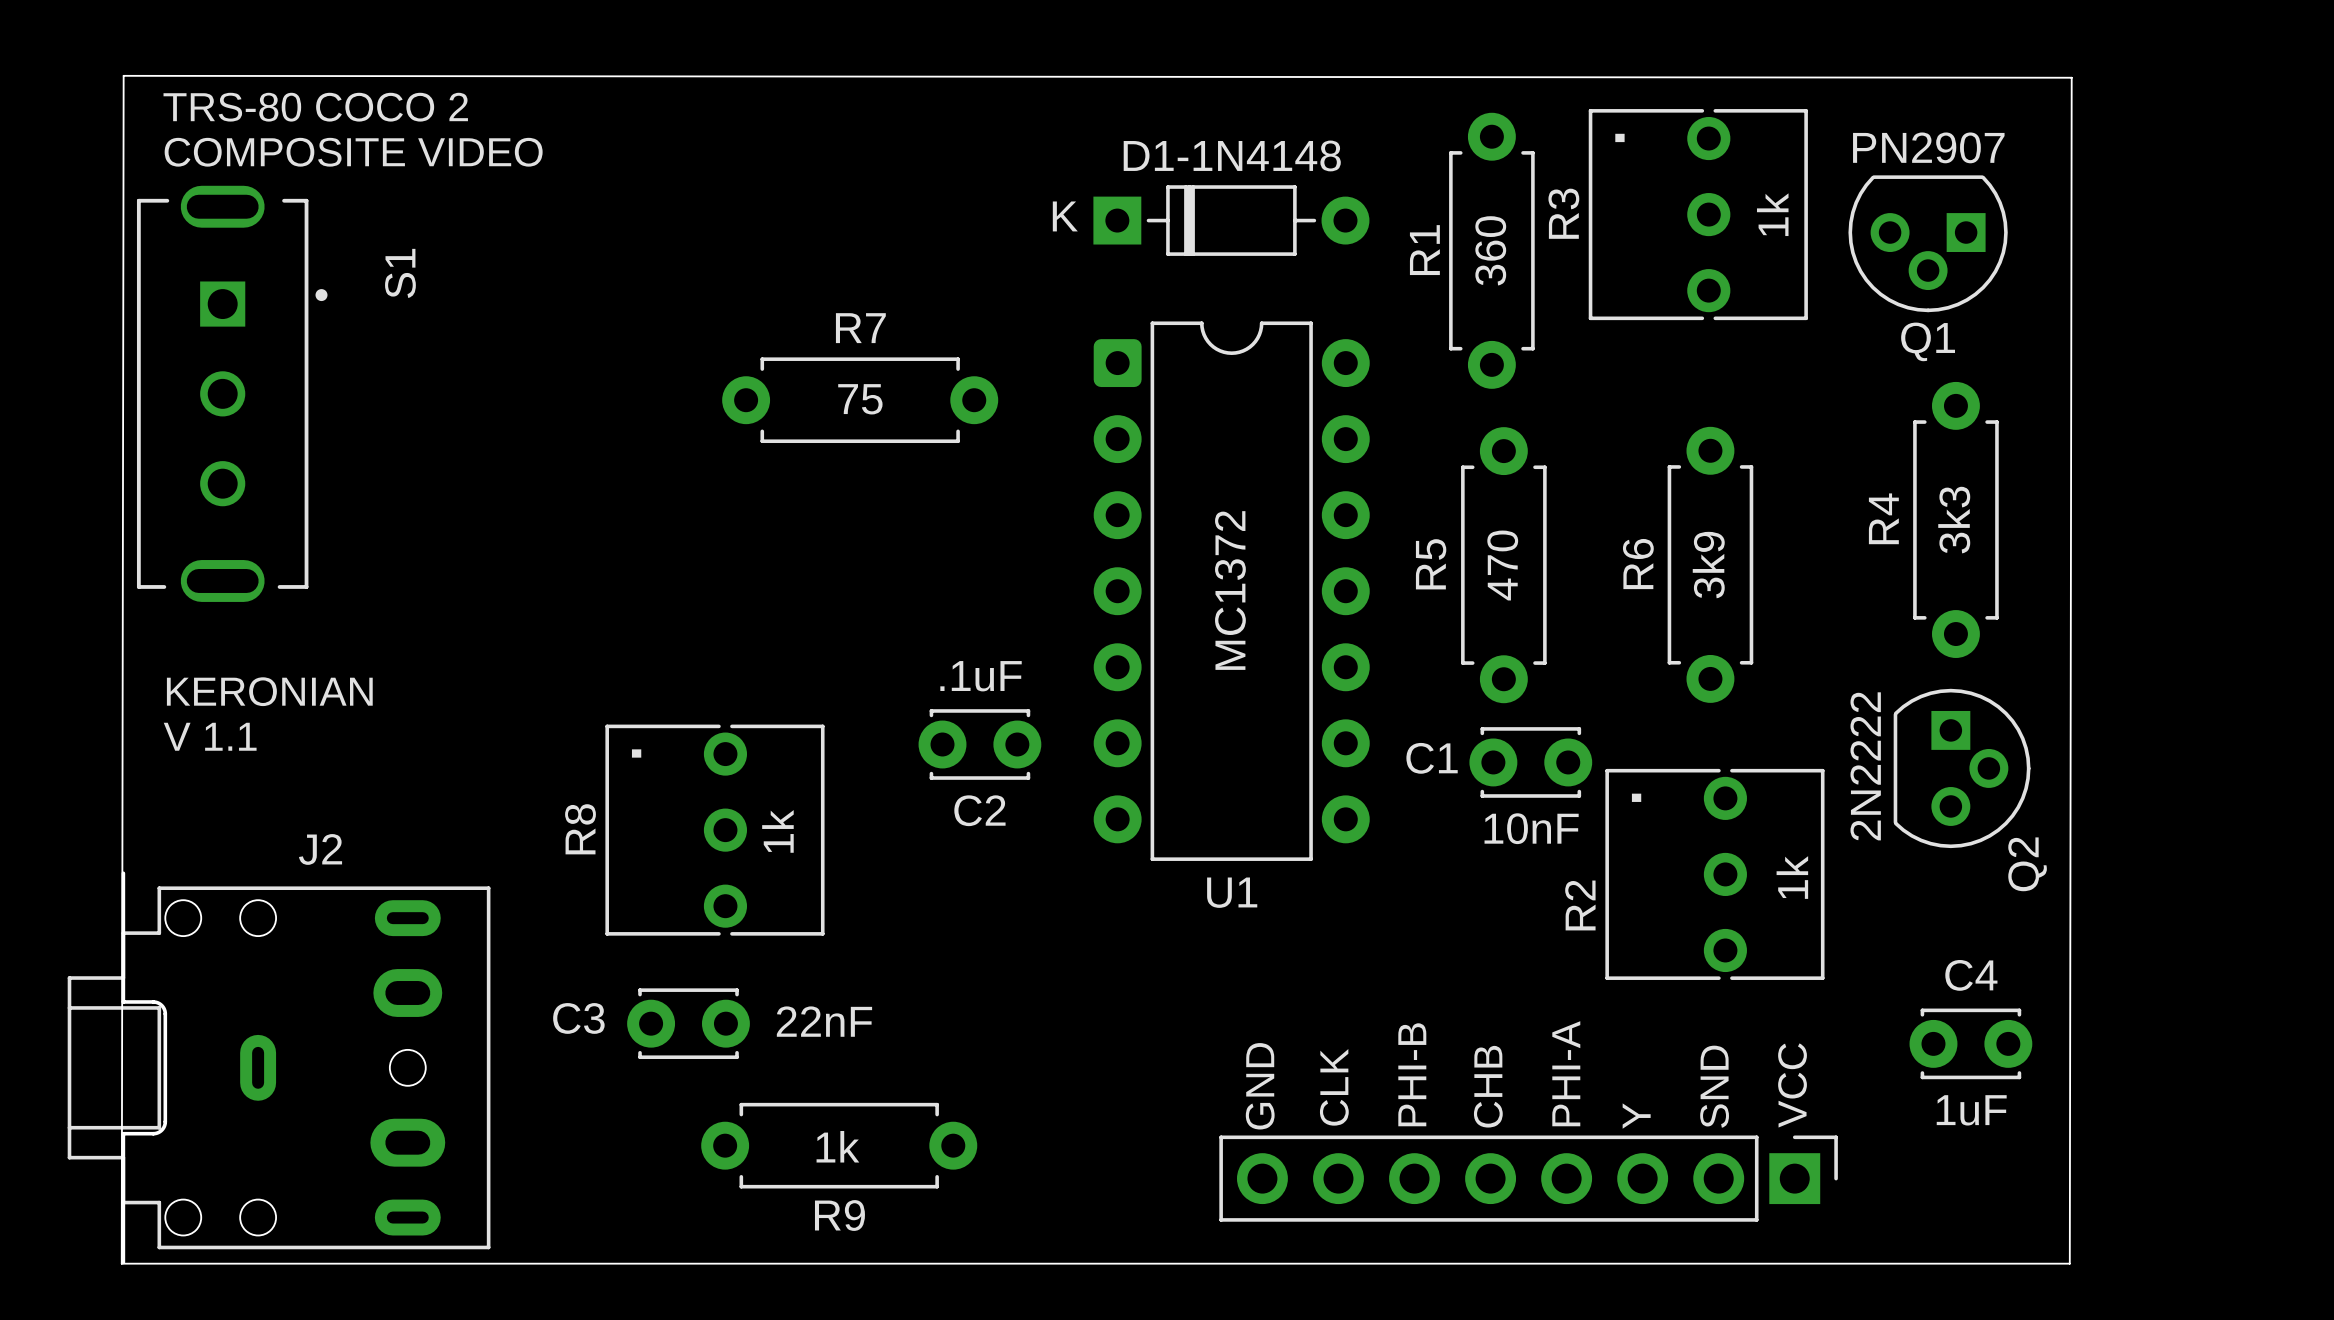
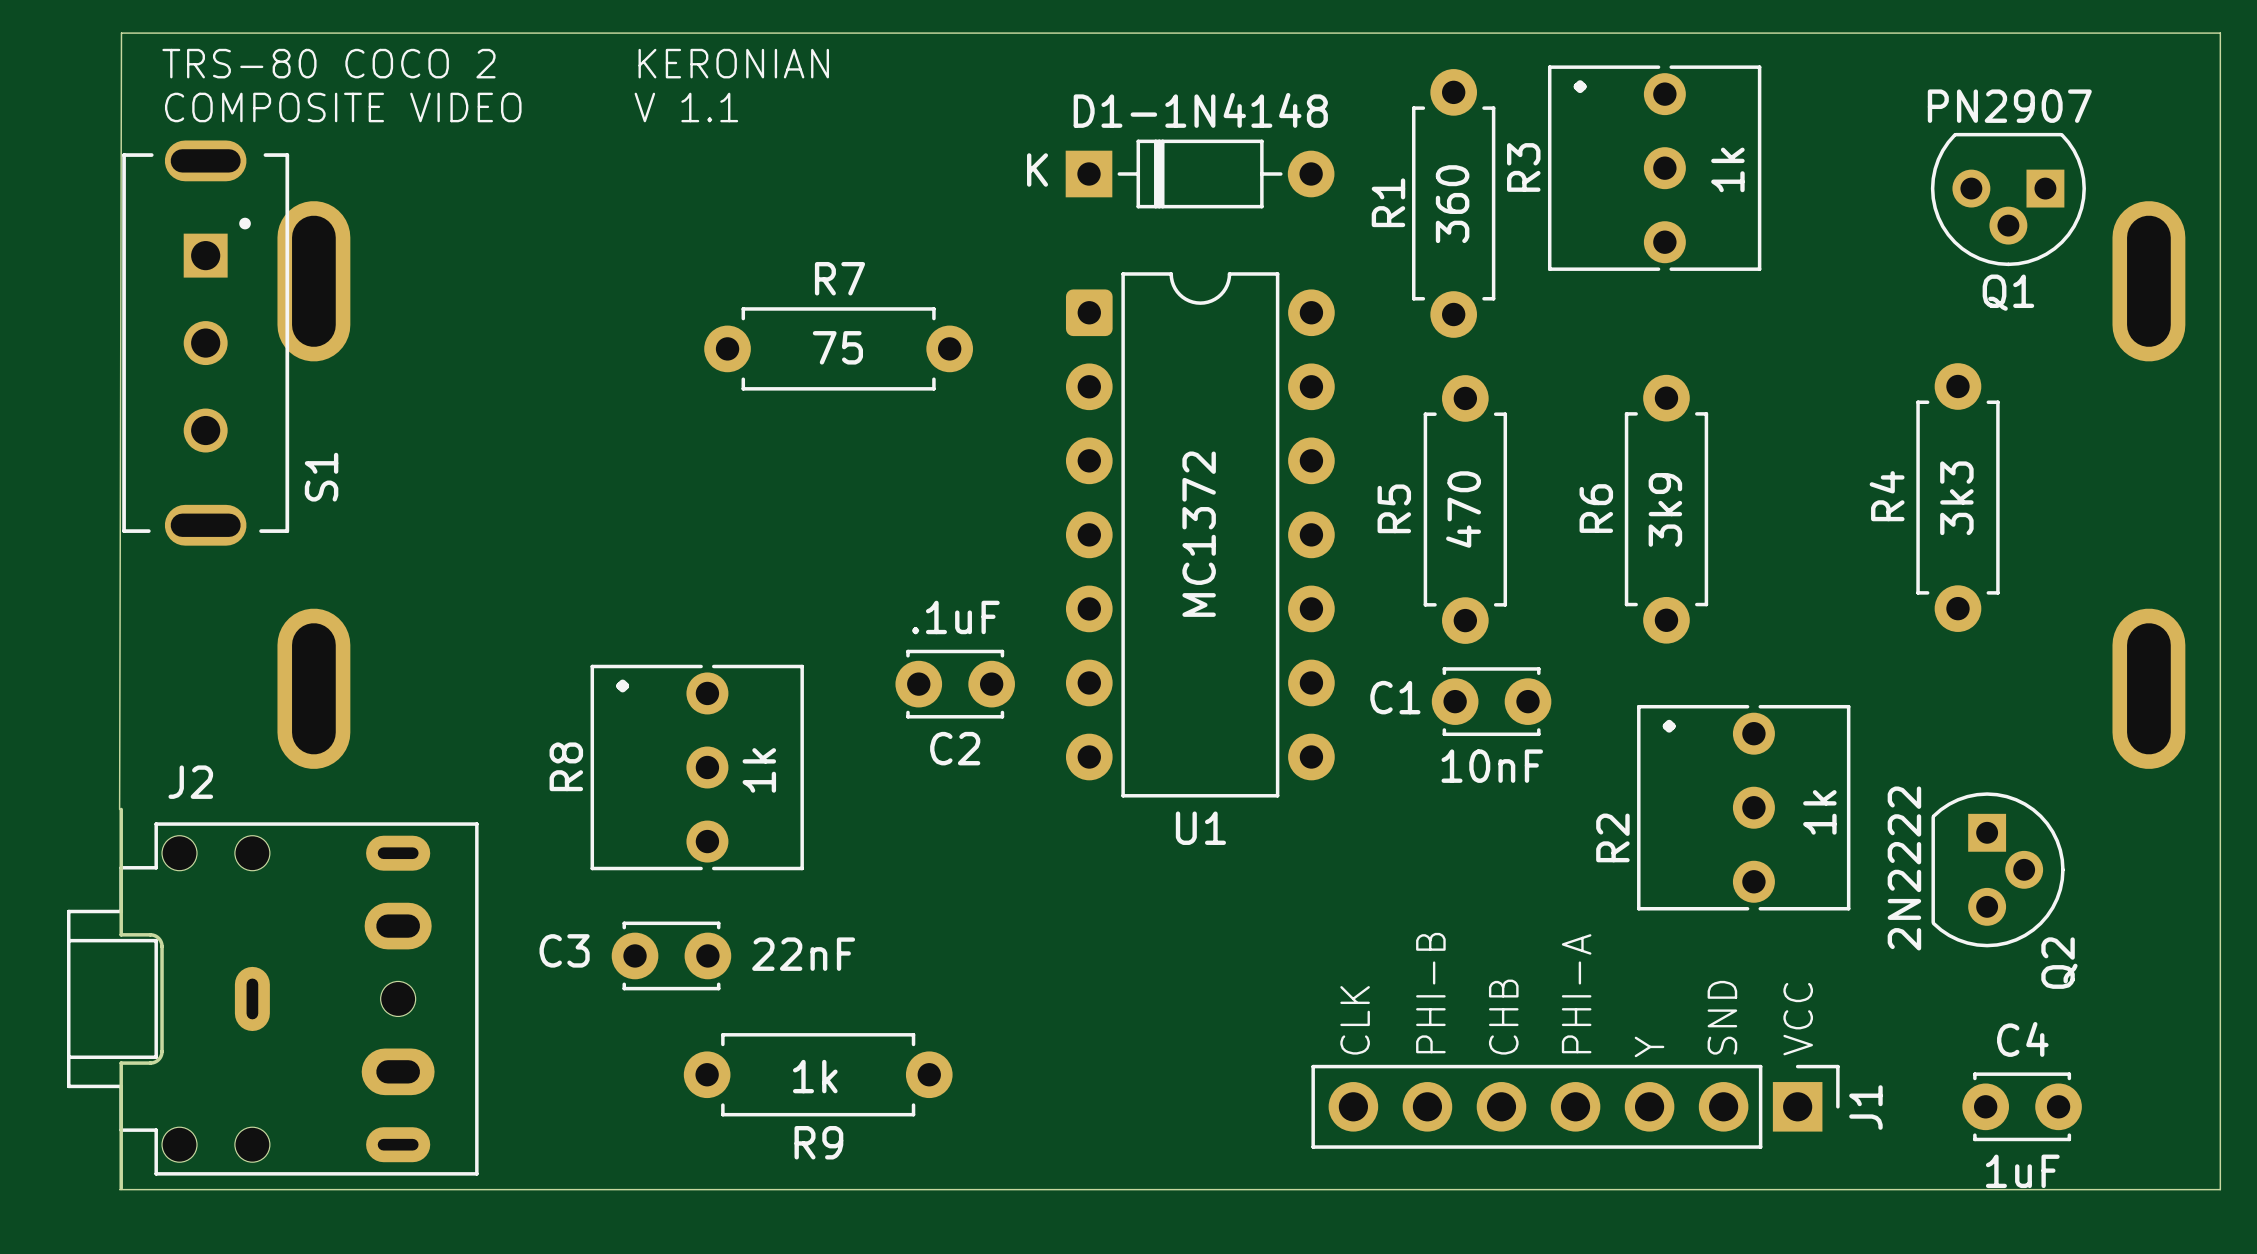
text: none -> KERONIAN (733, 63)
text: none -> V 1.1 (686, 107)
S1 footprint: [136, 185, 328, 602] -> [122, 140, 290, 546]
Q1 position: (1928, 243) -> (2008, 199)
S1 name position: S1 (400, 273) -> S1 (321, 477)
part: none -> (313, 281)
part: none -> (2148, 281)
R4 position: (1955, 519) -> (1957, 497)
text: KERONIAN (269, 691) -> none
text: V 1.1 (210, 736) -> none
part: none -> (313, 688)
part: none -> (2148, 688)
Q2 position: (1962, 768) -> (1998, 869)
J2 name position: J2 (320, 849) -> J2 (190, 782)
R2 position: (1714, 874) -> (1743, 807)
C4 position: (1970, 1043) -> (2022, 1106)
text position: PHI-A (1566, 1073) -> PHI-A (1576, 993)
text position: PHI-B (1412, 1074) -> PHI-B (1430, 993)
text position: VCC (1792, 1085) -> VCC (1798, 1019)
text: GND (1260, 1086) -> none
text position: CHB (1488, 1086) -> CHB (1503, 1017)
text position: SND (1714, 1086) -> SND (1722, 1017)
text position: CLK (1334, 1087) -> CLK (1355, 1020)
text position: Y (1636, 1116) -> Y (1649, 1046)
part: (1528, 1178) -> none
J1: none -> (1575, 1106)
board edge: (121, 1263) (123, 75) (2071, 77) (2069, 1263) -> (119, 809) (121, 33) (2220, 33) (2220, 1189) (2016, 1189)

